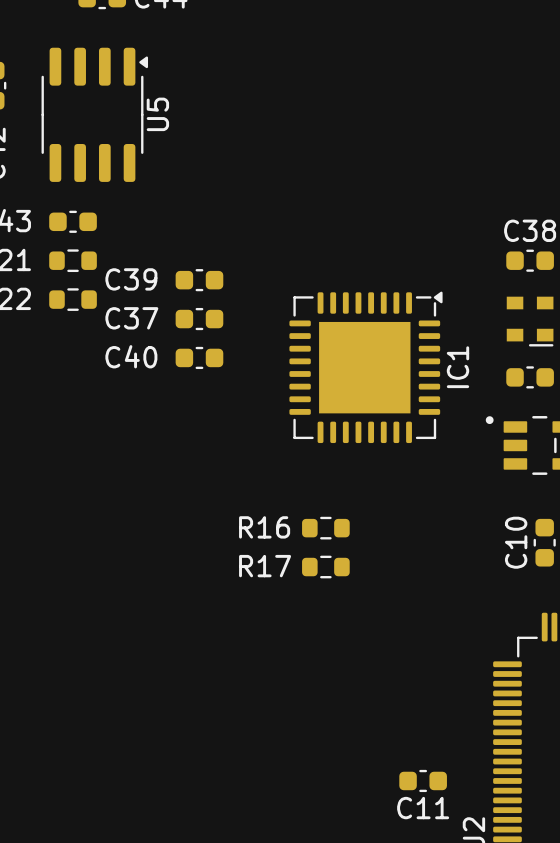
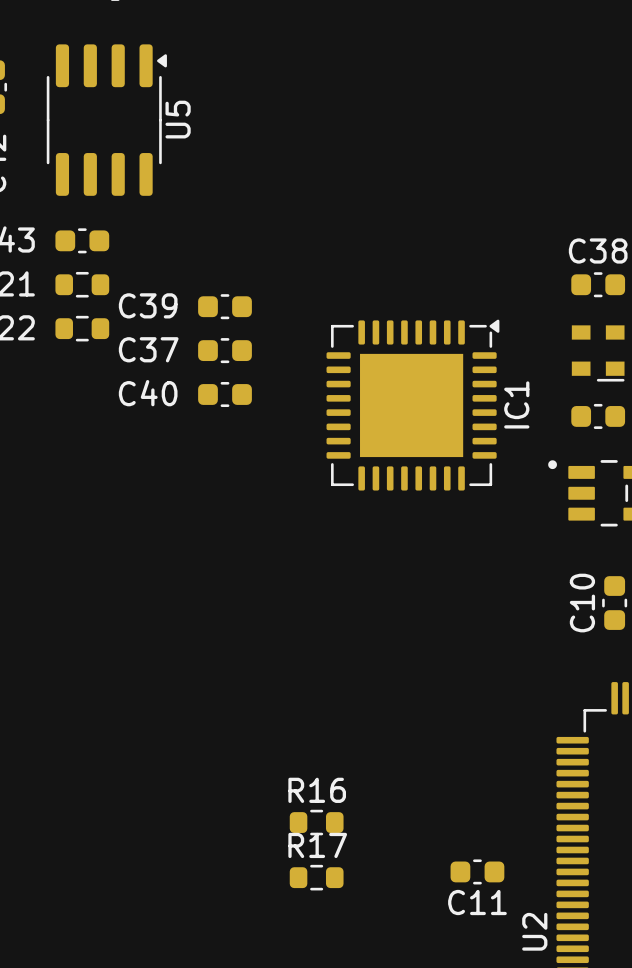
R16 name position: R16 (264, 527) -> R16 (317, 790)
R16 position: (325, 528) -> (316, 822)
R17 name position: R17 (265, 566) -> R17 (317, 845)
R17 position: (325, 567) -> (316, 877)

